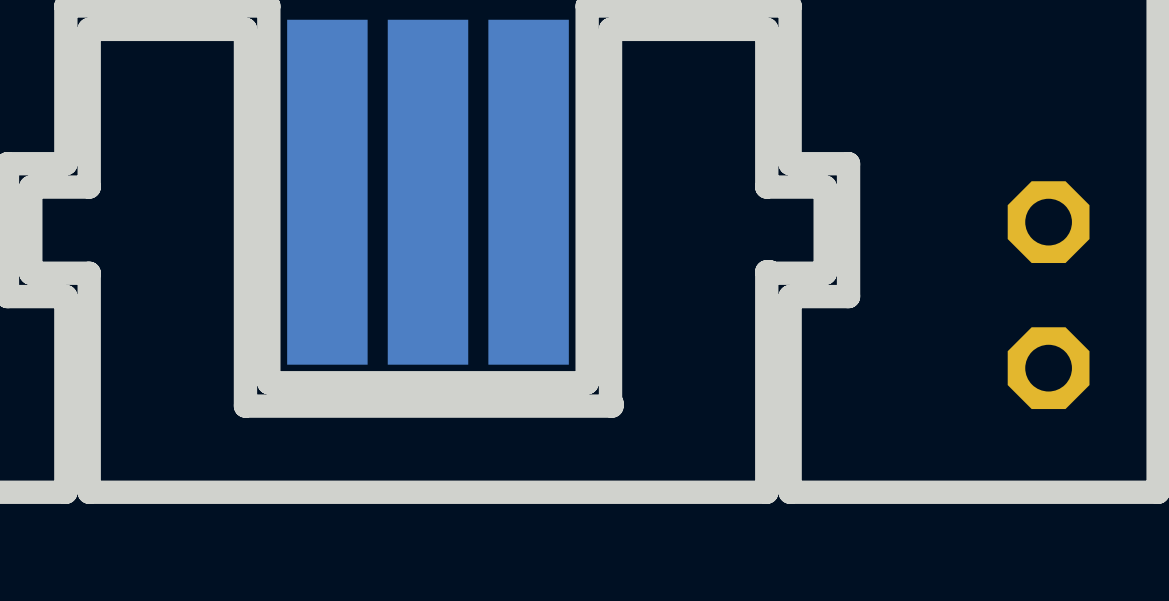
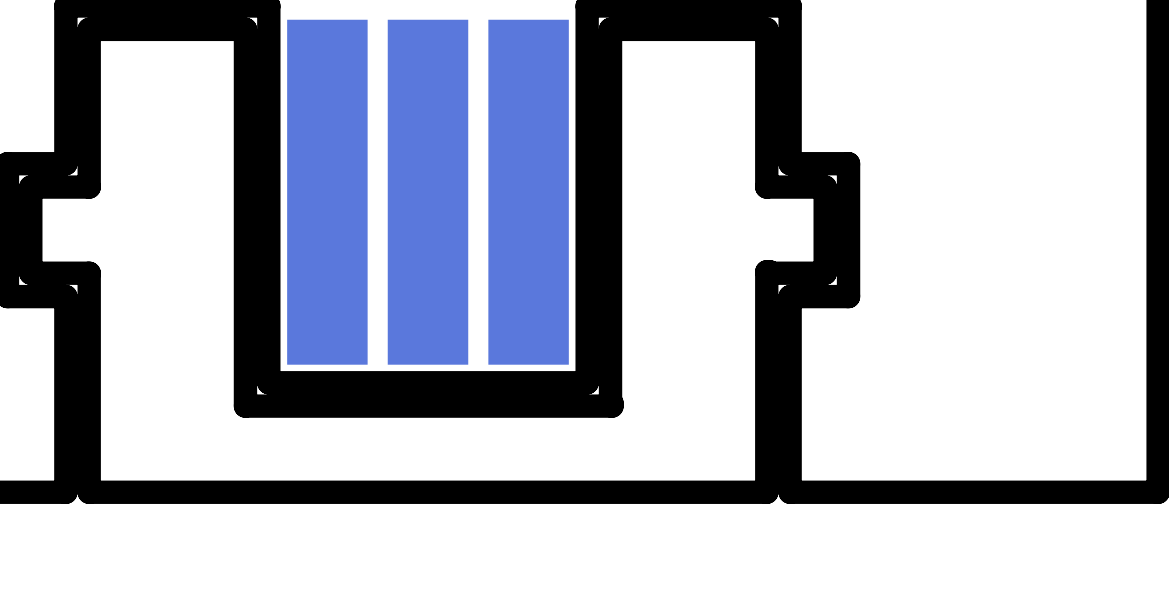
part: (1048, 295) -> none

